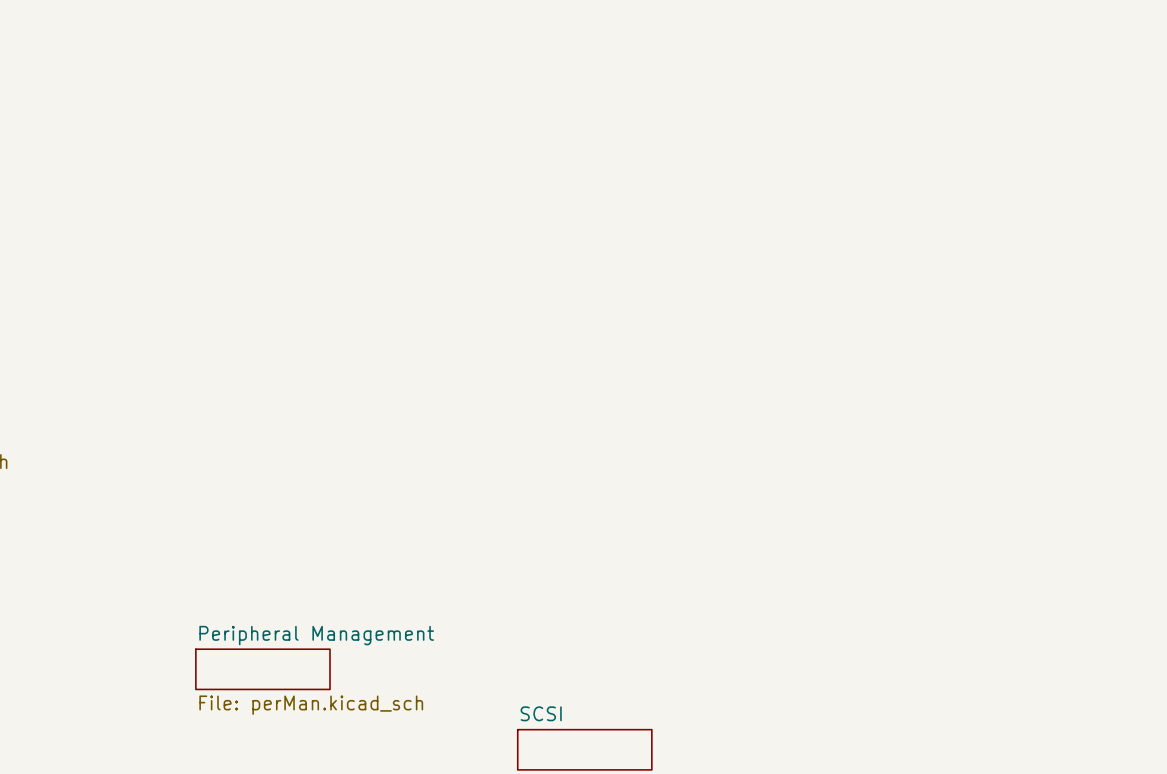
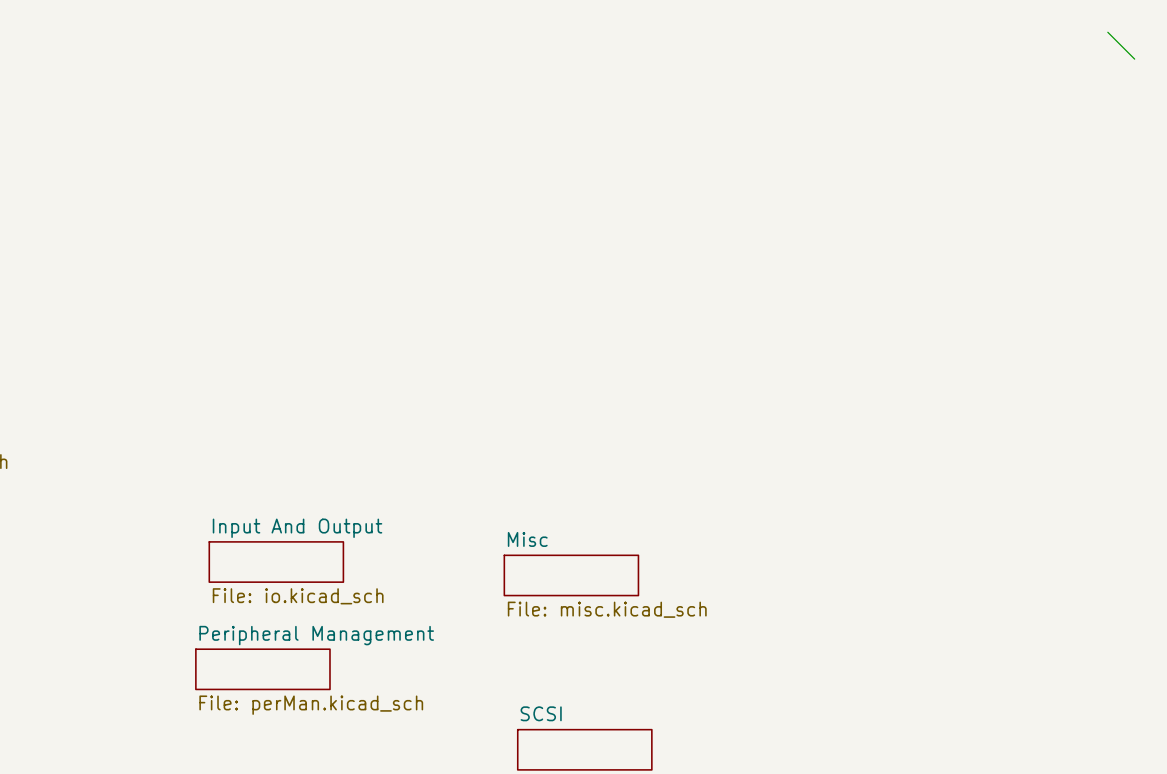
wire: none -> (1107, 32) (1134, 59)
sheet Input And Output: none -> File: io.kicad_sch (276, 562)
sheet Misc: none -> File: misc.kicad_sch (571, 575)

